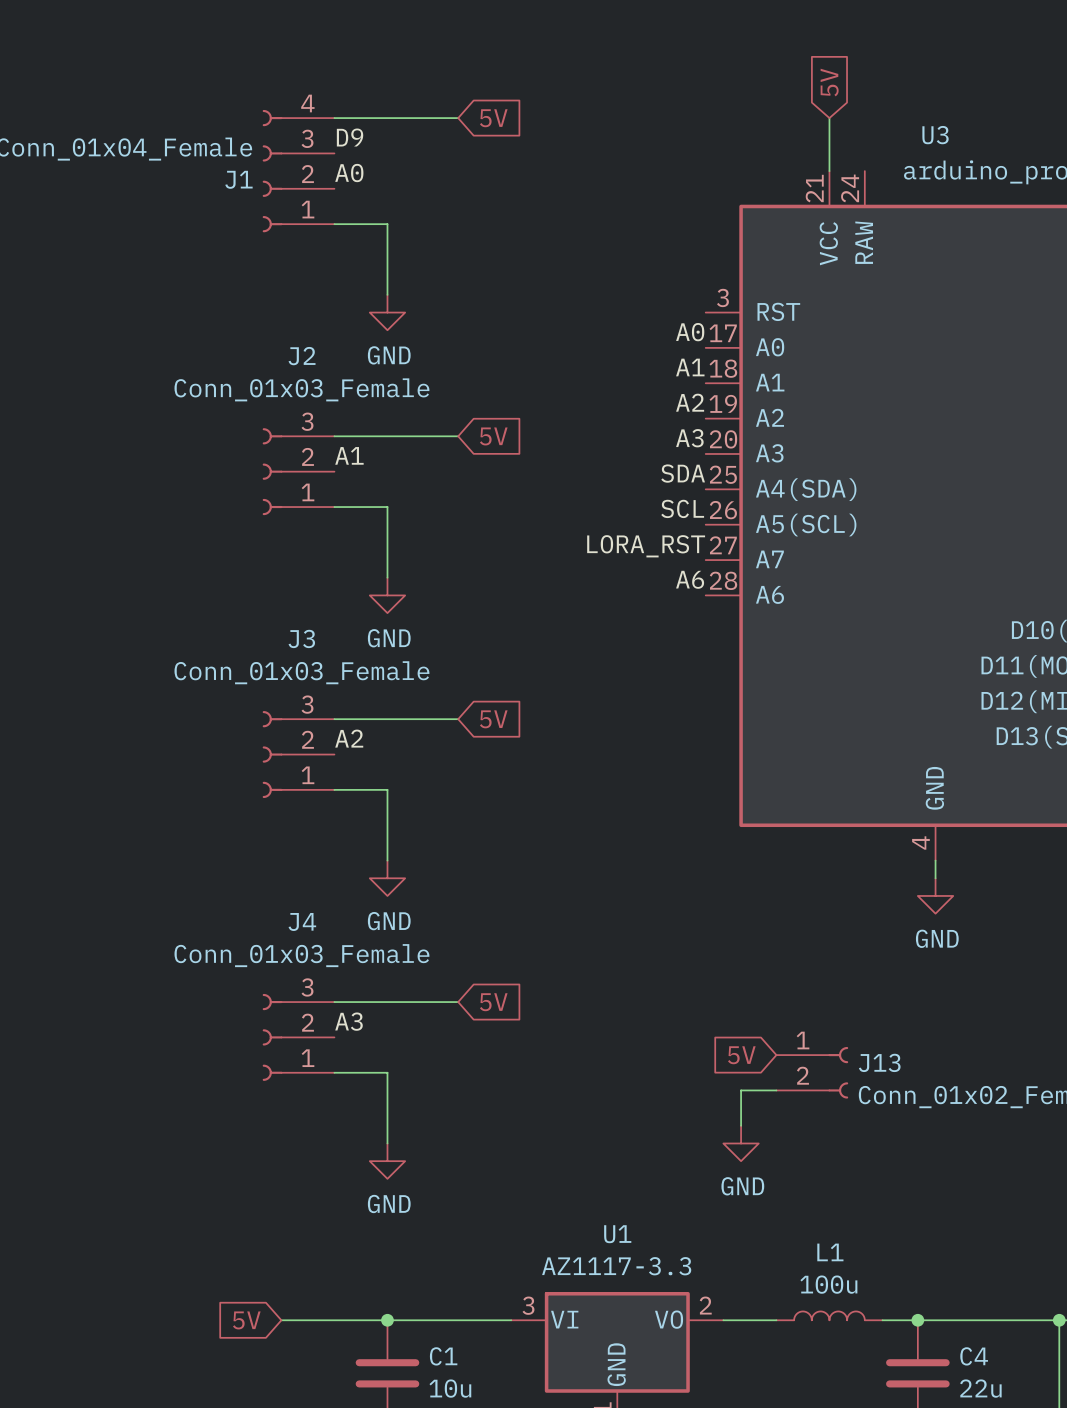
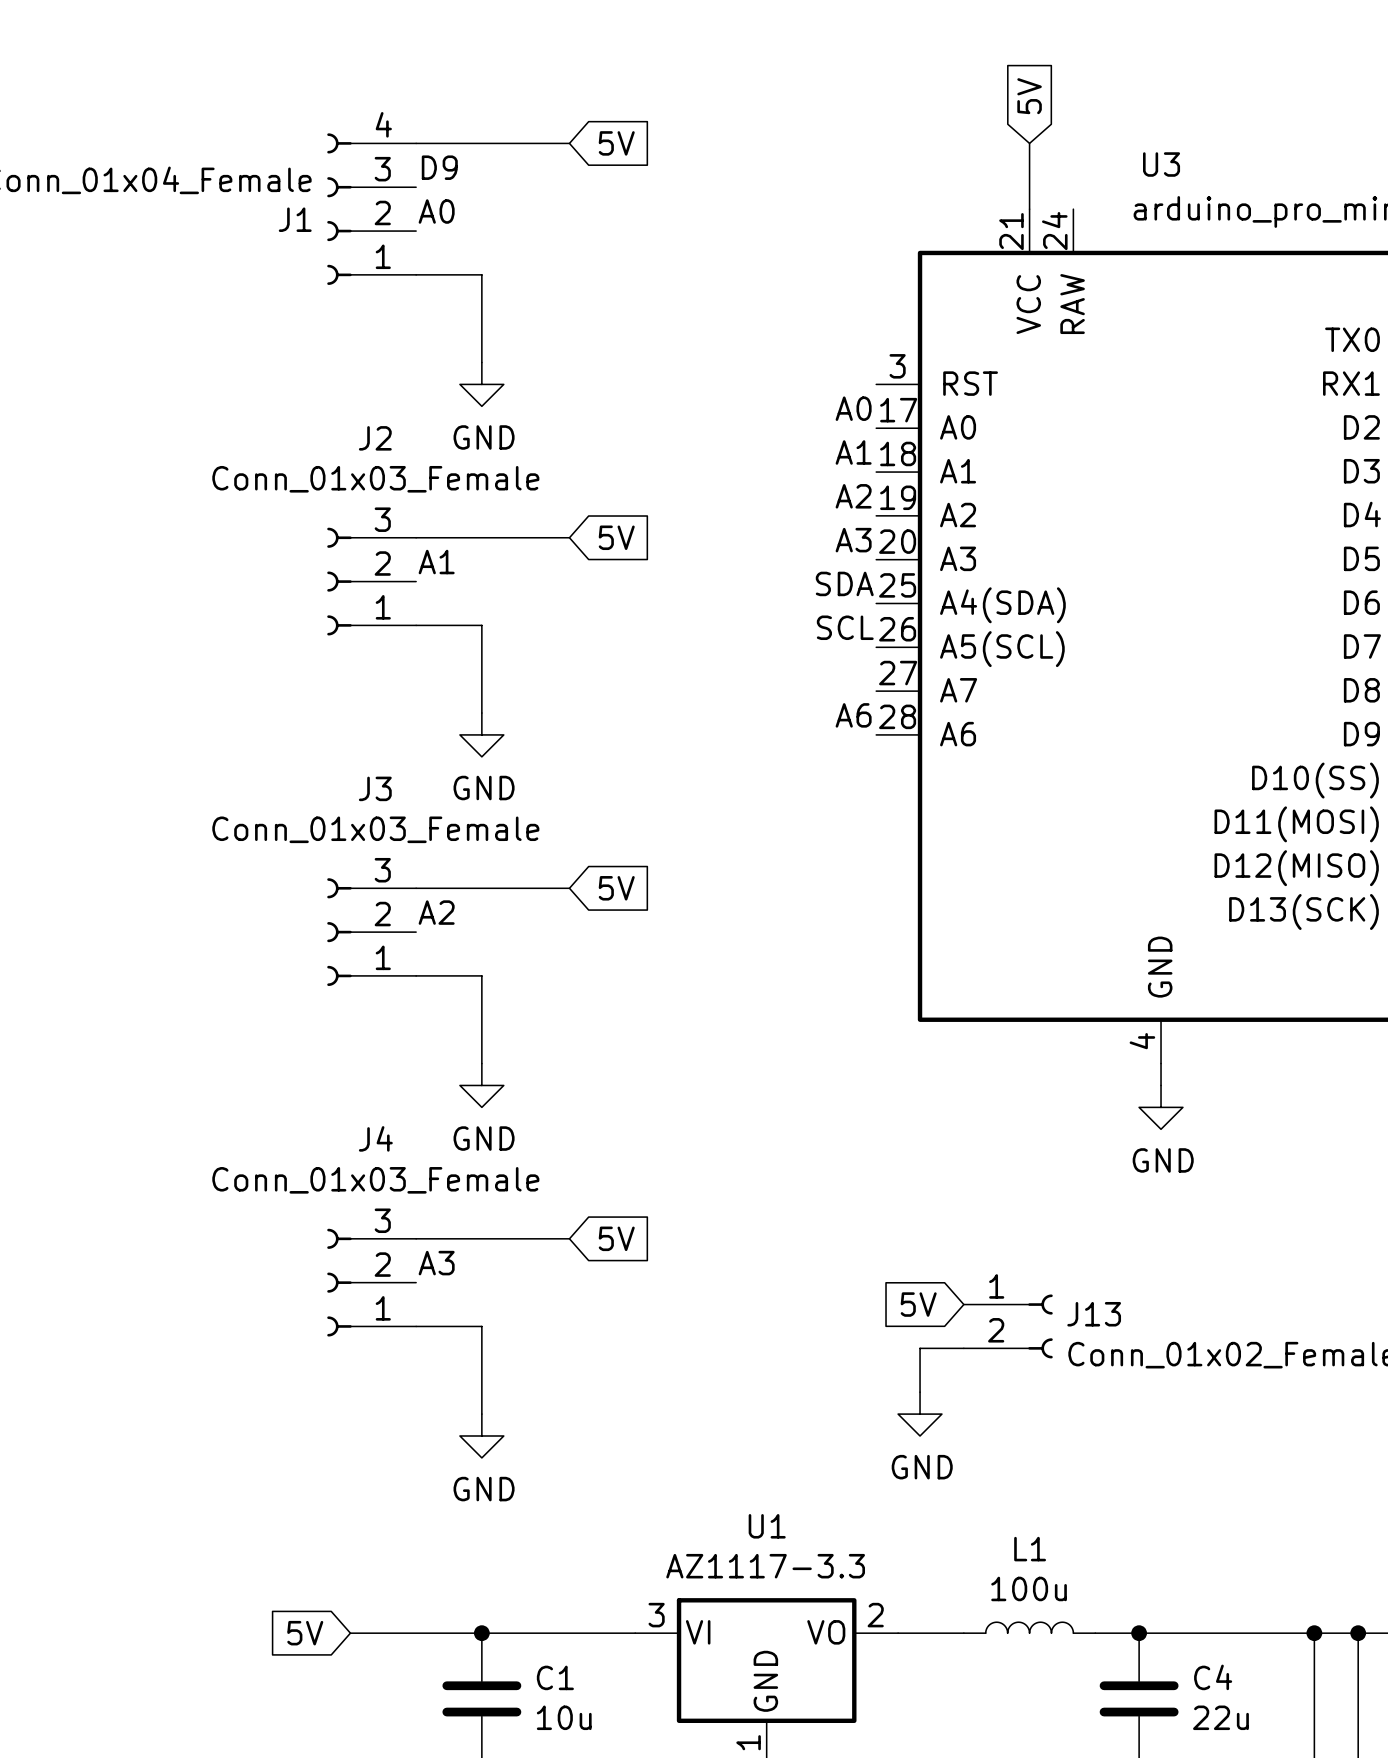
label: LORA_RST (646, 546) -> none

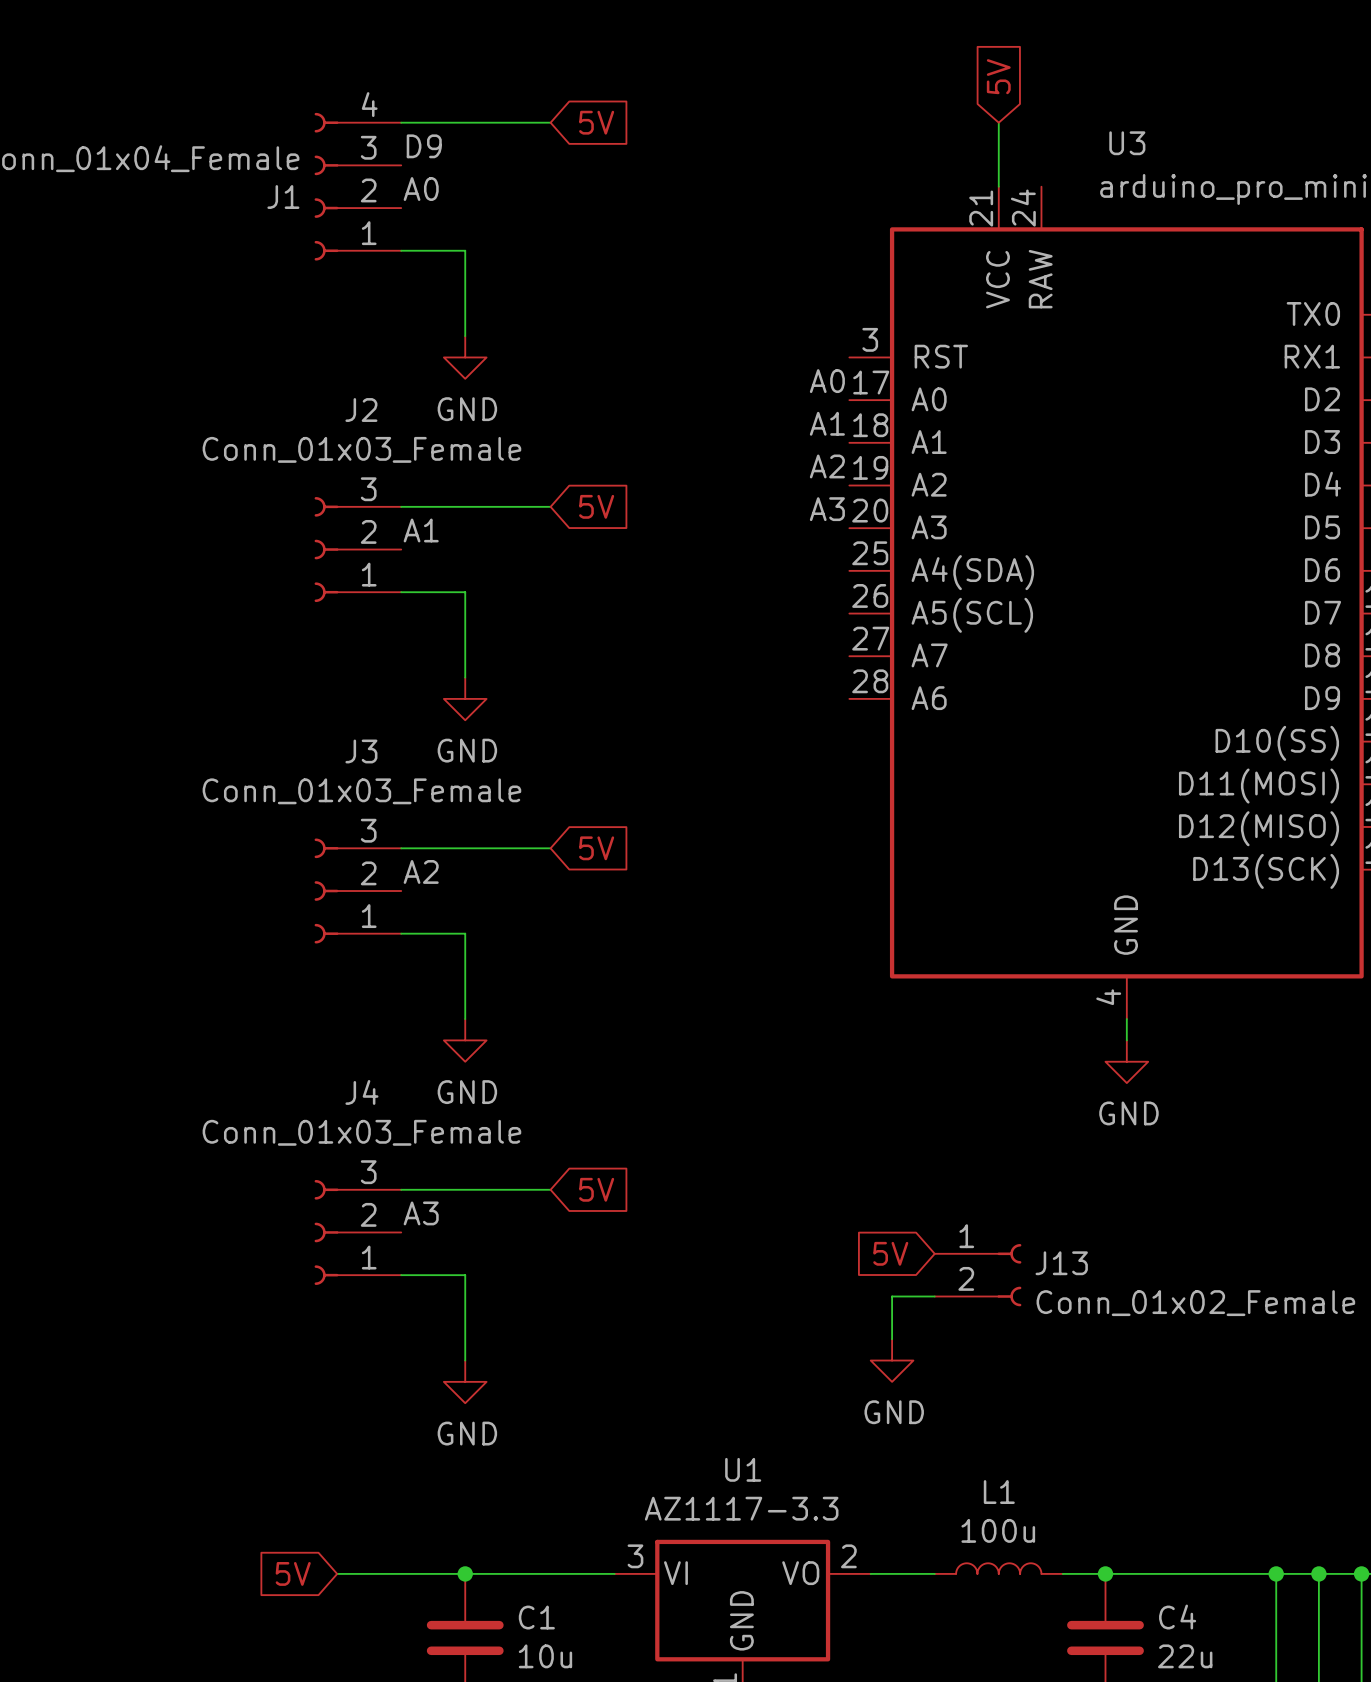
label: SDA (844, 583) -> none
label: SCL (845, 627) -> none
label: A6 (853, 715) -> none

